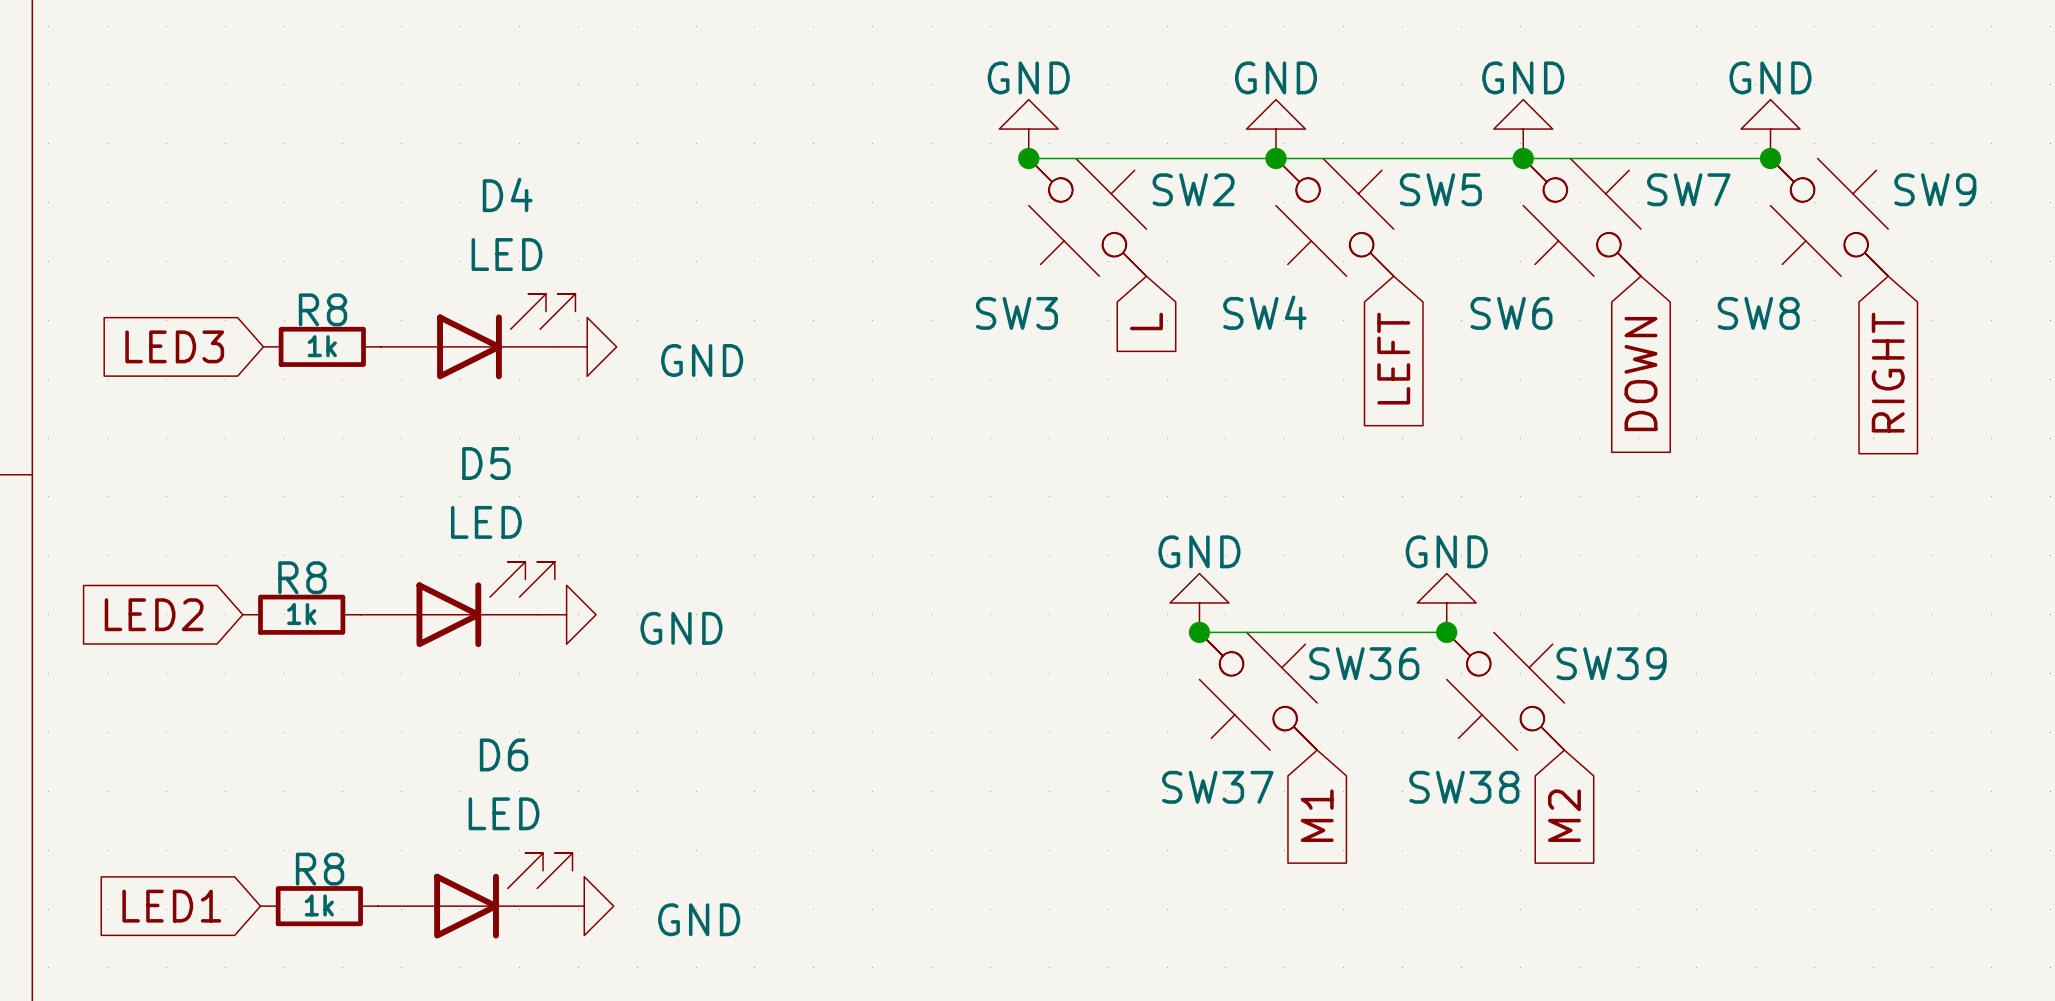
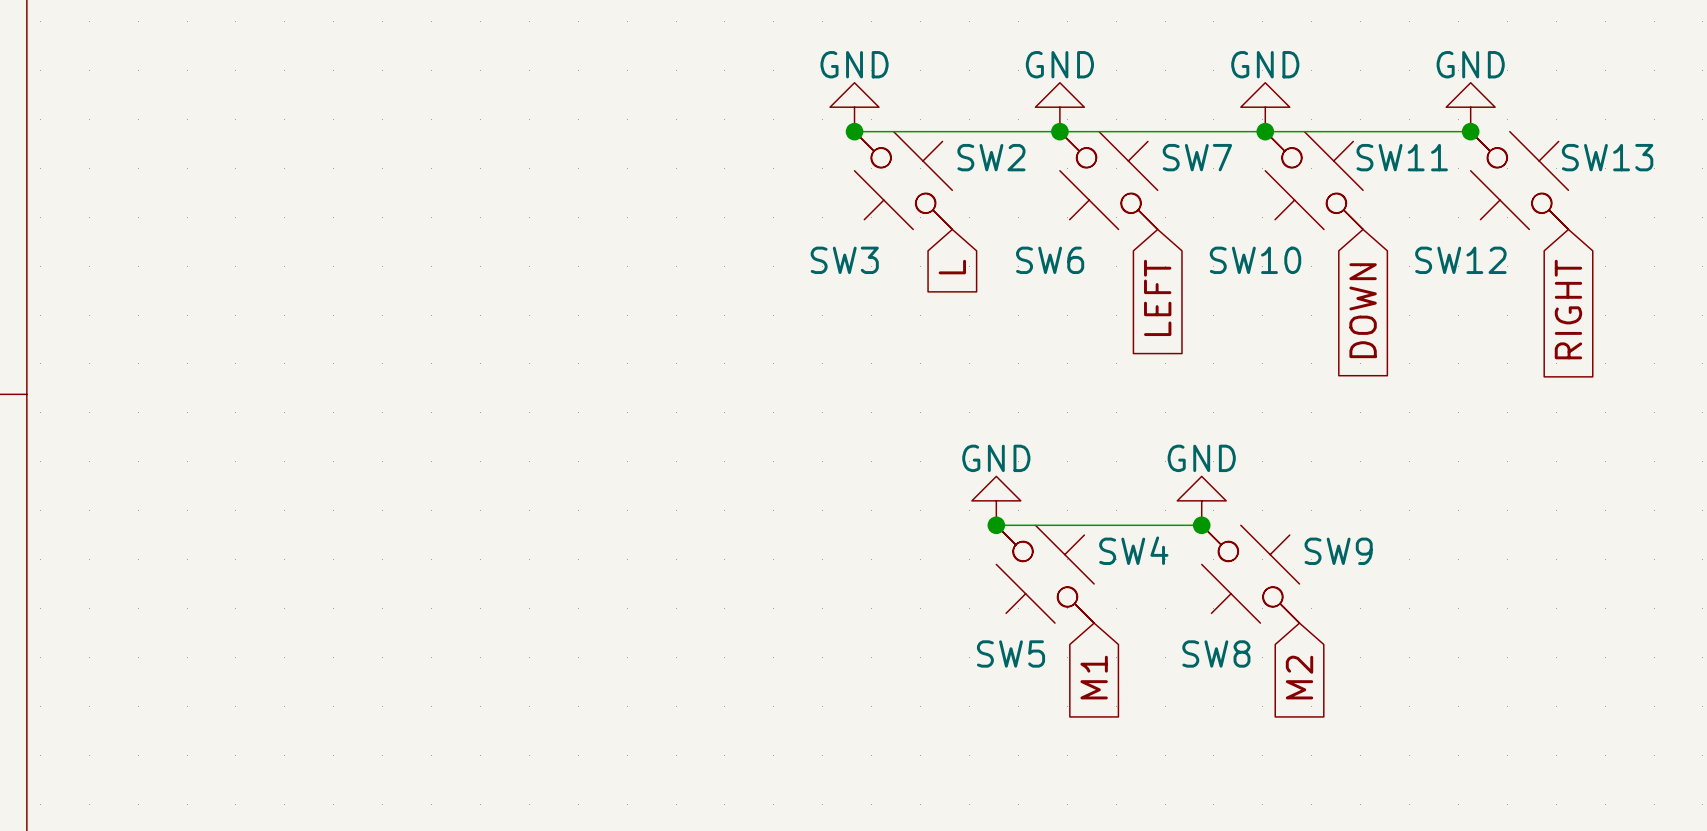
SW5 name: SW5 (1440, 189) -> SW7 (1197, 157)
SW7 name: SW7 (1688, 189) -> SW11 (1402, 157)
SW9 name: SW9 (1935, 189) -> SW13 (1607, 157)
SW4 name: SW4 (1264, 312) -> SW6 (1050, 260)
SW6 name: SW6 (1511, 313) -> SW10 (1255, 260)
SW8 name: SW8 (1758, 313) -> SW12 (1460, 260)
D4: LED (478, 336) -> none
global label: LED3 (174, 346) -> none
R8: 1k (322, 346) -> none
power symbol: GND (587, 346) -> none
D5: LED (457, 604) -> none
global label: LED2 (154, 614) -> none
R8: 1k (301, 614) -> none
power symbol: GND (566, 614) -> none
SW36 name: SW36 (1364, 663) -> SW4 (1133, 550)
SW39 name: SW39 (1611, 663) -> SW9 (1338, 551)
SW37 name: SW37 (1217, 787) -> SW5 (1011, 653)
SW38 name: SW38 (1464, 787) -> SW8 (1216, 653)
D6: LED (475, 895) -> none
global label: LED1 (171, 906) -> none
R8: 1k (319, 906) -> none
power symbol: GND (584, 906) -> none

